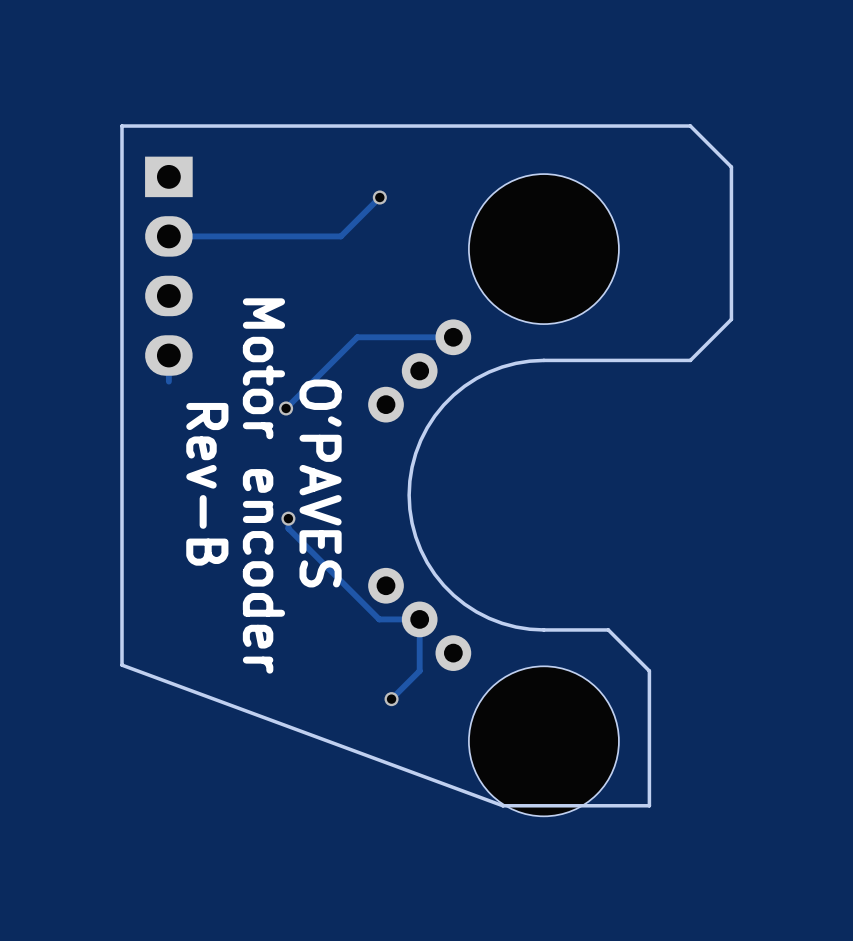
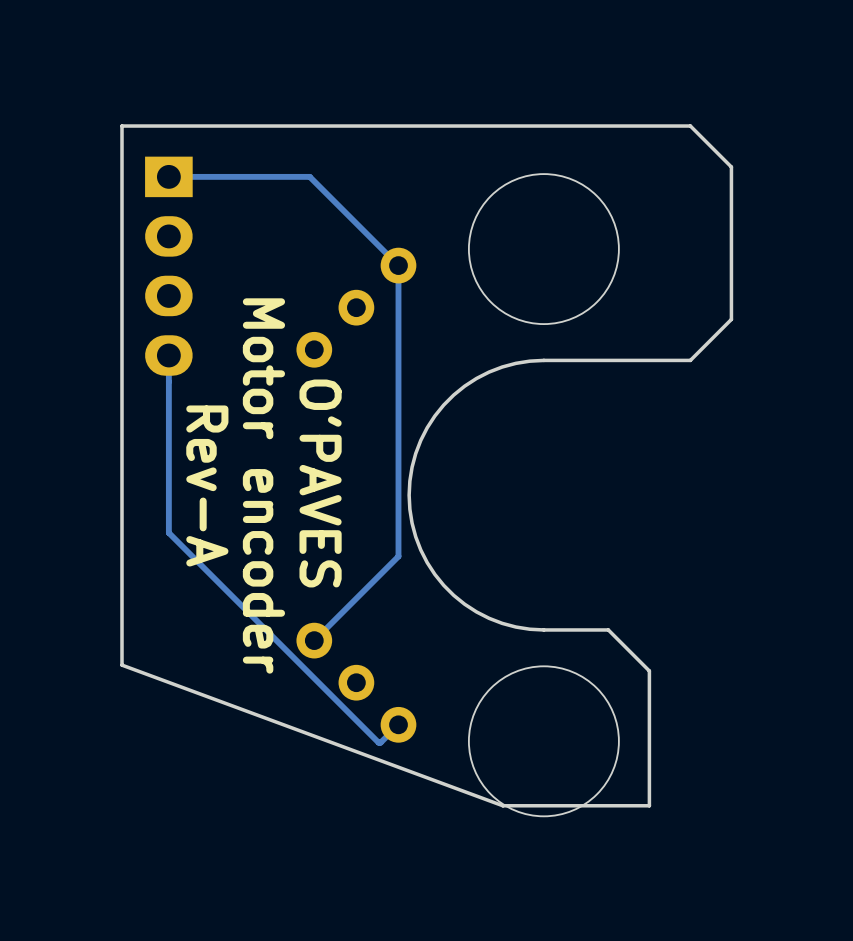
track: none -> (168, 176) (309, 176) (398, 265) (398, 556) (314, 640)
track: (379, 197) (340, 236) (168, 236) -> none
via: (379, 197) -> none
part: none -> (356, 307)
track: (453, 337) (357, 337) (286, 408) -> none
part: (419, 370) -> none
track: none -> (168, 381) (168, 532) (378, 742) (398, 724)
via: (286, 408) -> none
text: Rev-B (207, 484) -> Rev-A (207, 485)
track: (288, 518) (288, 528) (379, 619) (419, 619) (419, 670) (391, 699) -> none
via: (288, 518) -> none
part: (419, 619) -> none
part: none -> (356, 682)
via: (391, 699) -> none

